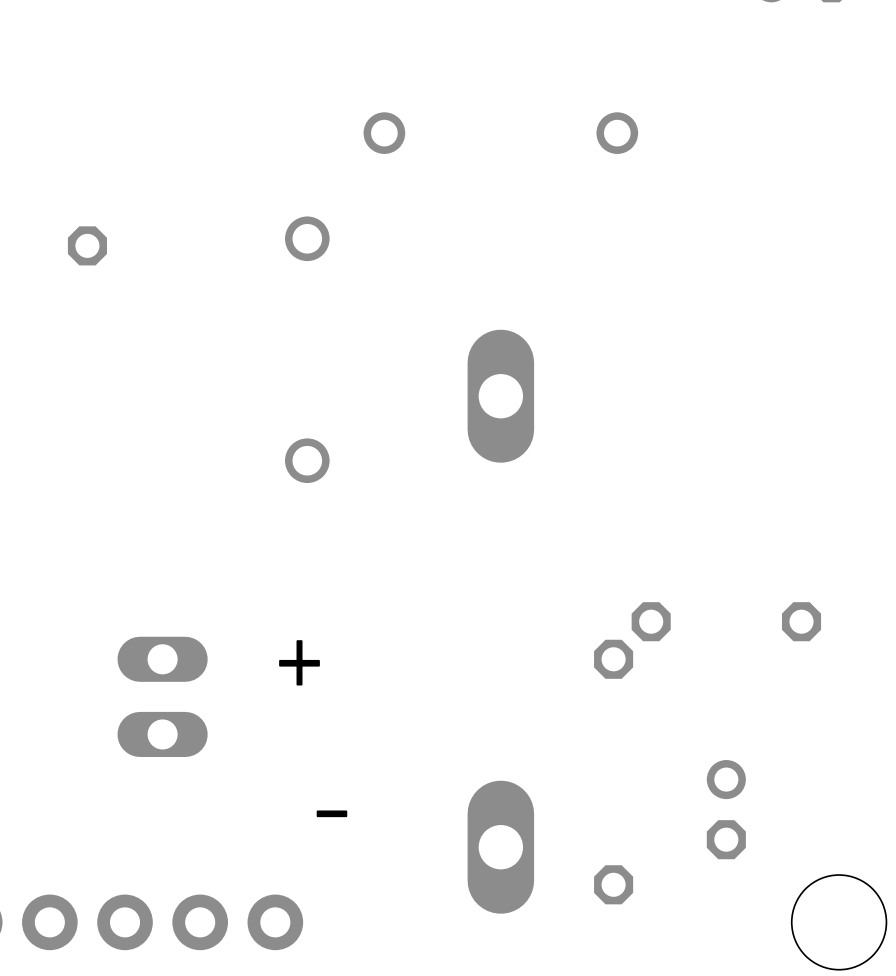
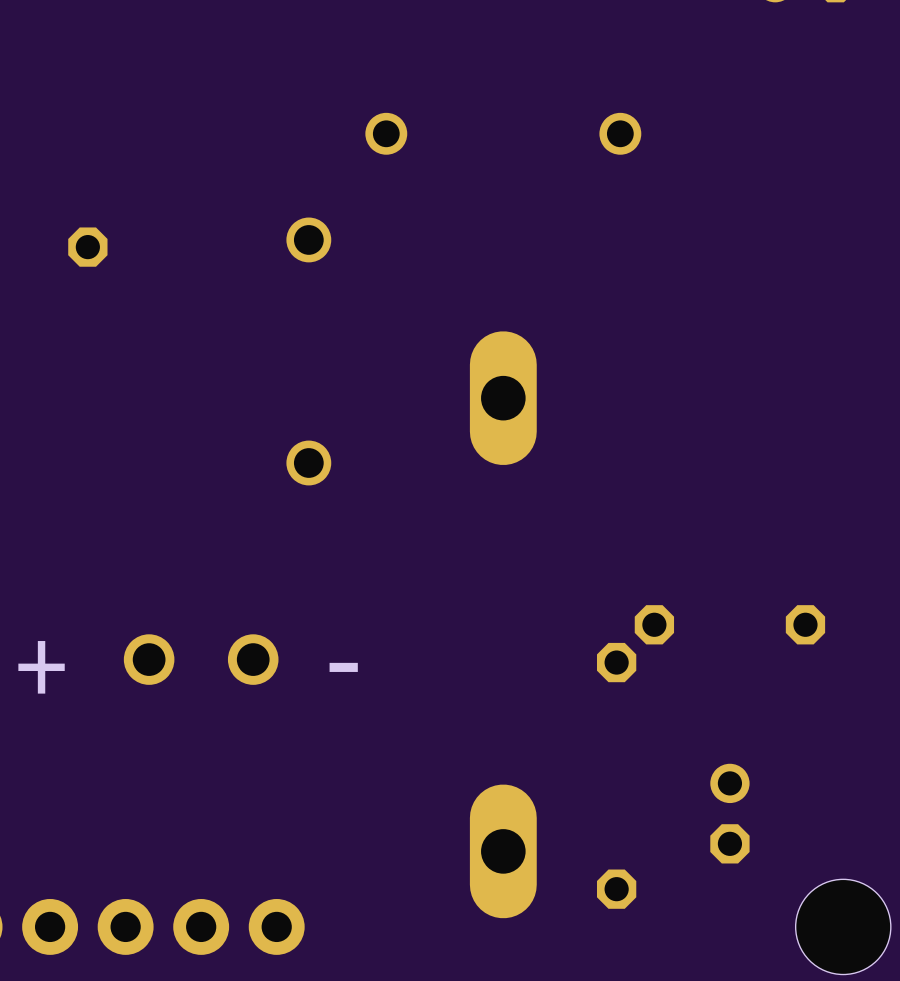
part: none -> (201, 659)
text position: + (299, 662) -> + (41, 667)
part: (162, 696) -> none
text position: - (331, 813) -> - (343, 667)

